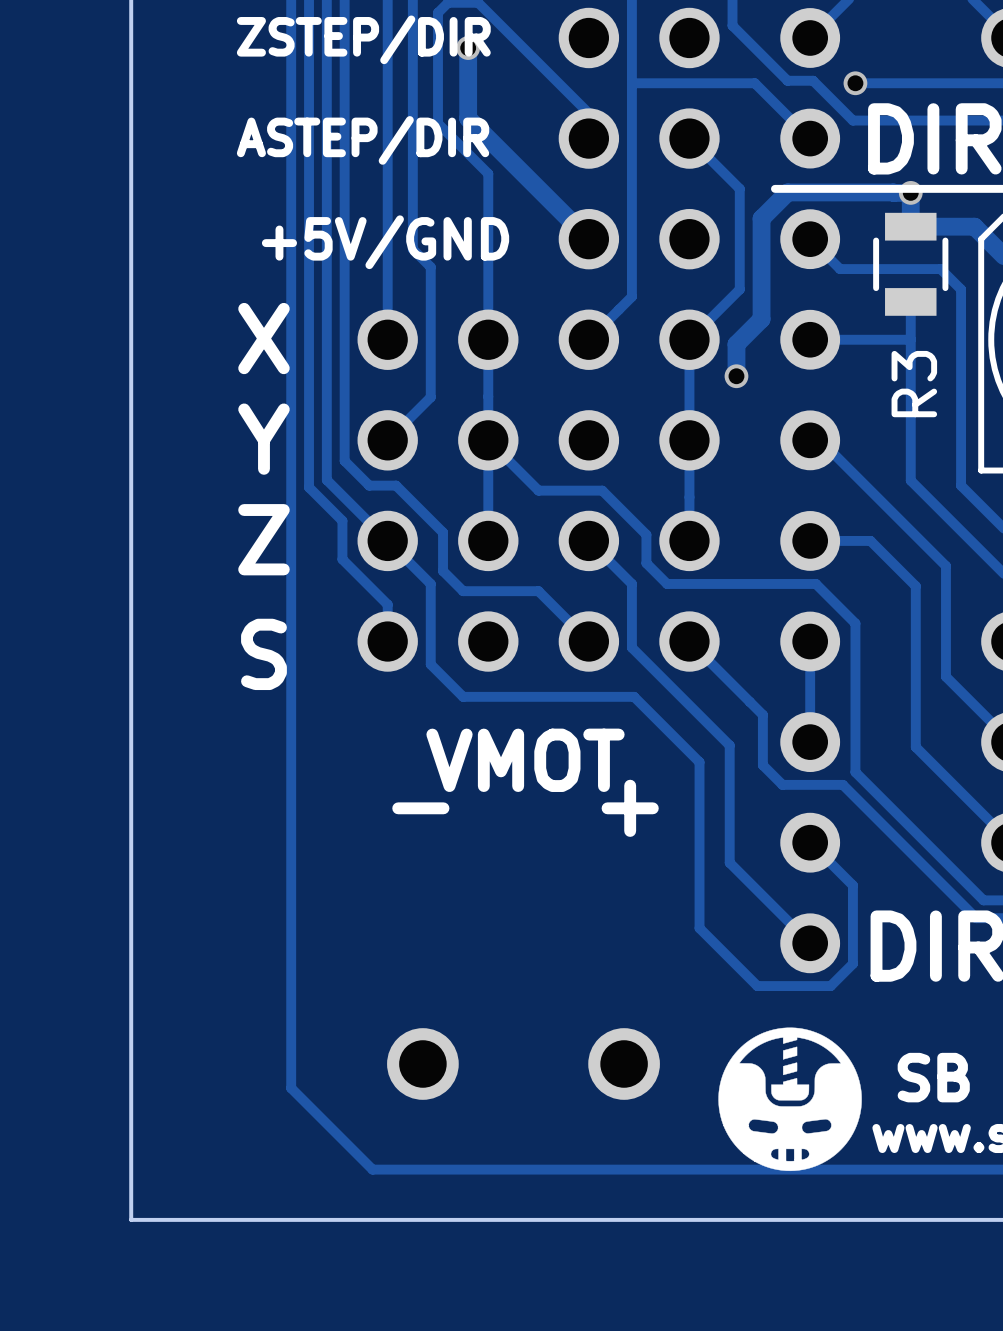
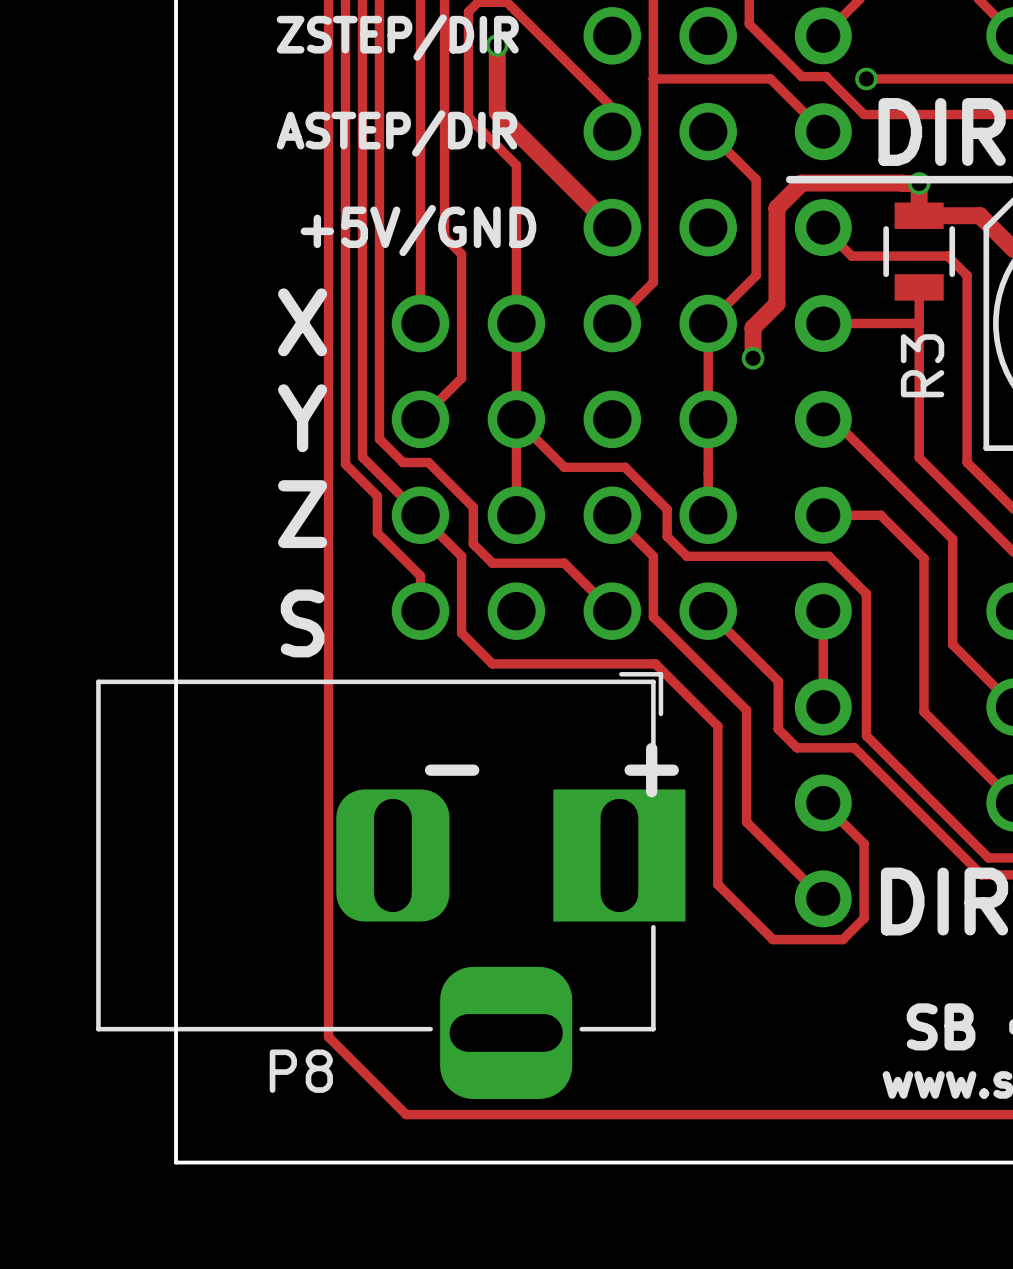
P8: none -> (390, 885)
drawing: [718, 1027, 862, 1172] -> none
part: VMOT (523, 1063) -> none

